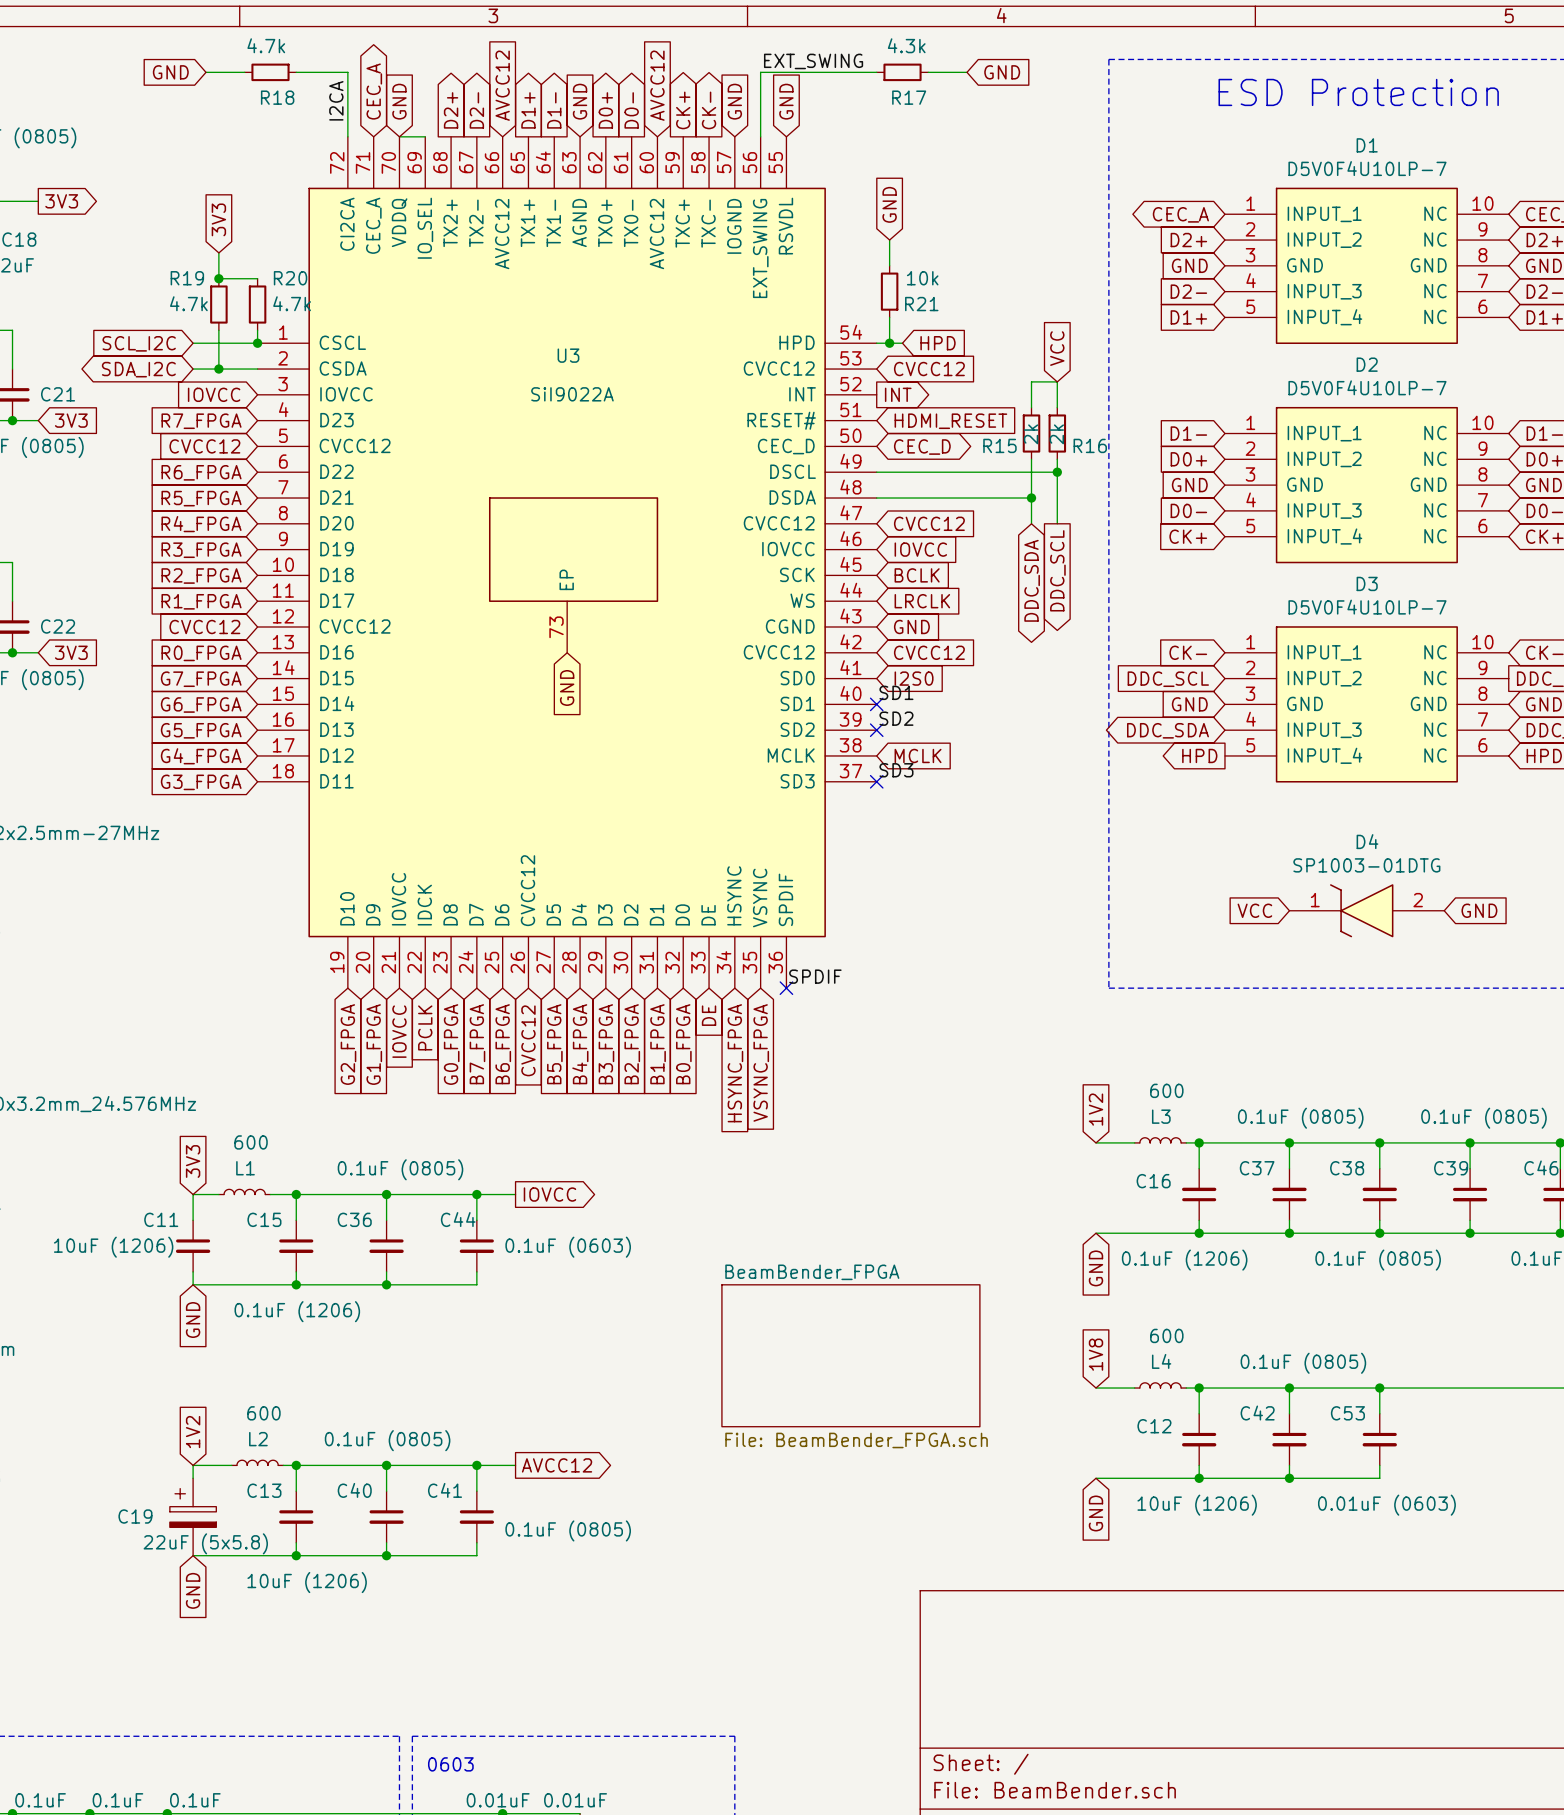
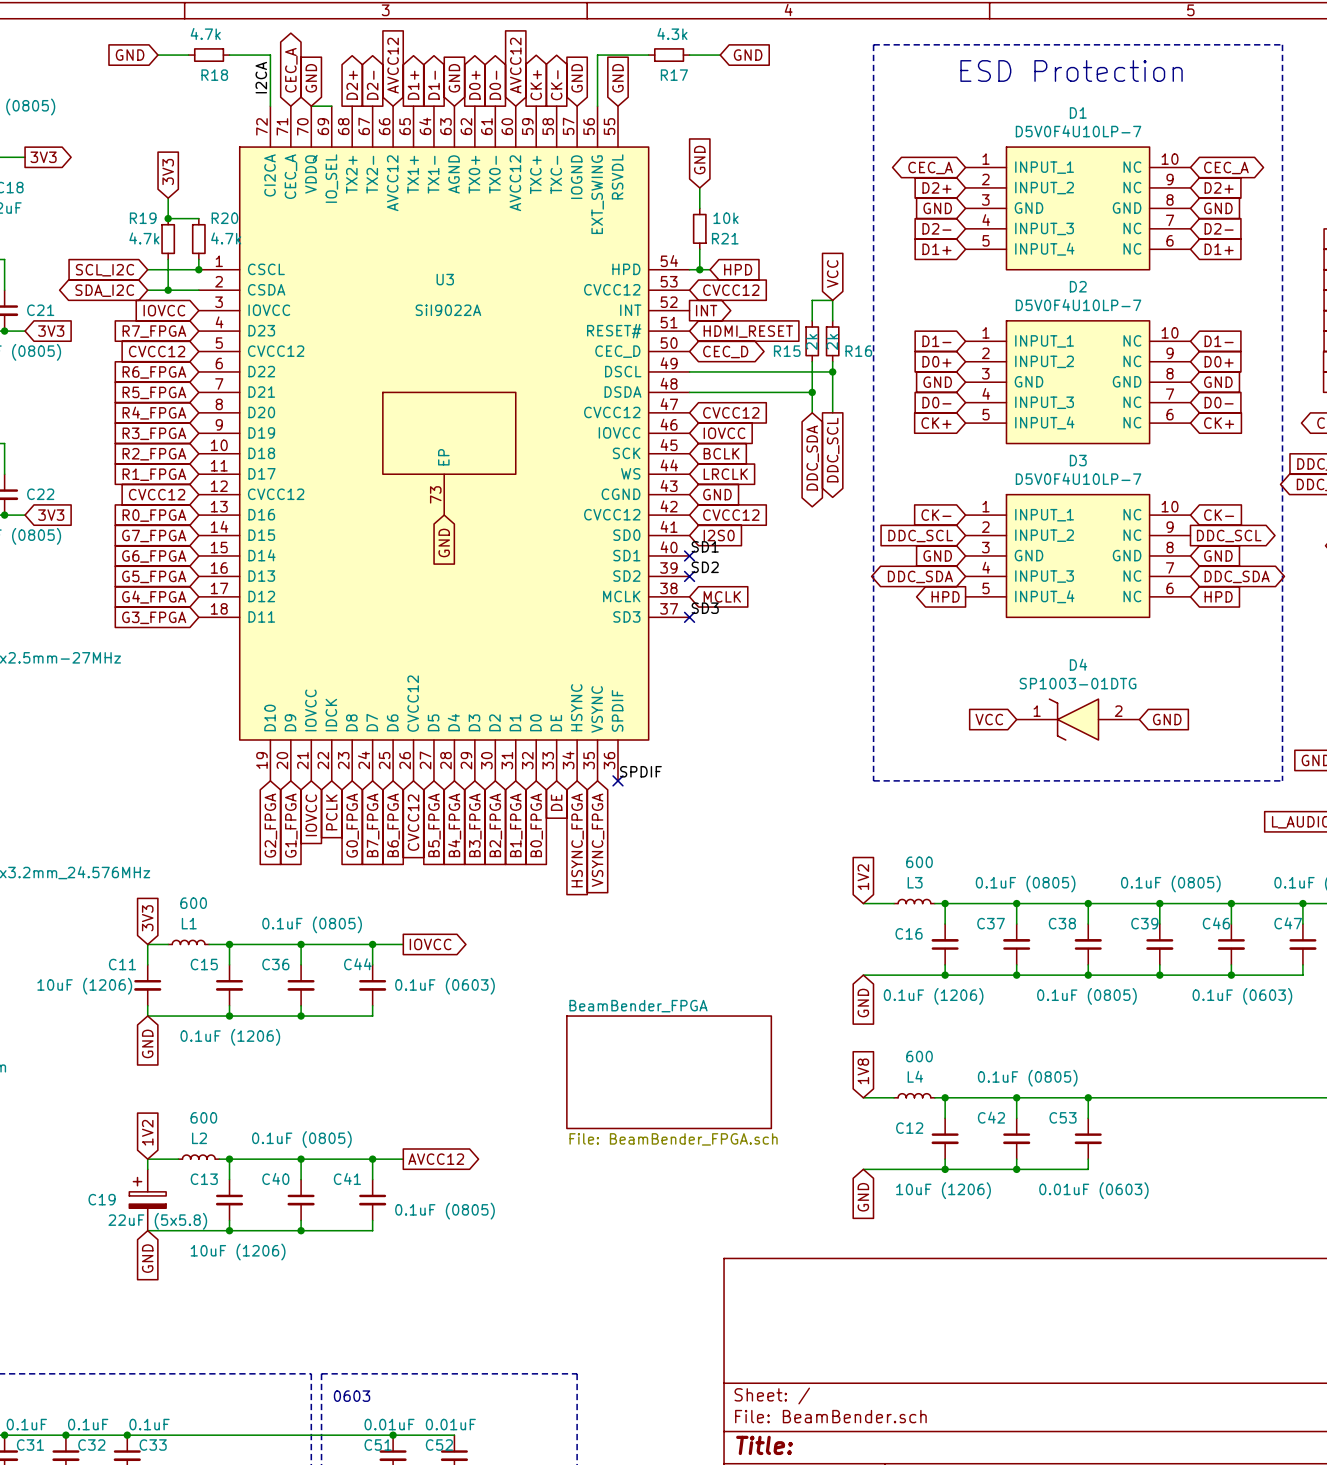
label: EXT_SWING (813, 61) -> none
wire: (825, 72) (876, 72) -> (720, 55) (689, 55)
R17 position: (902, 72) -> (669, 55)
wire: (928, 72) (967, 72) -> none
global label position: GND (1002, 72) -> GND (748, 55)

